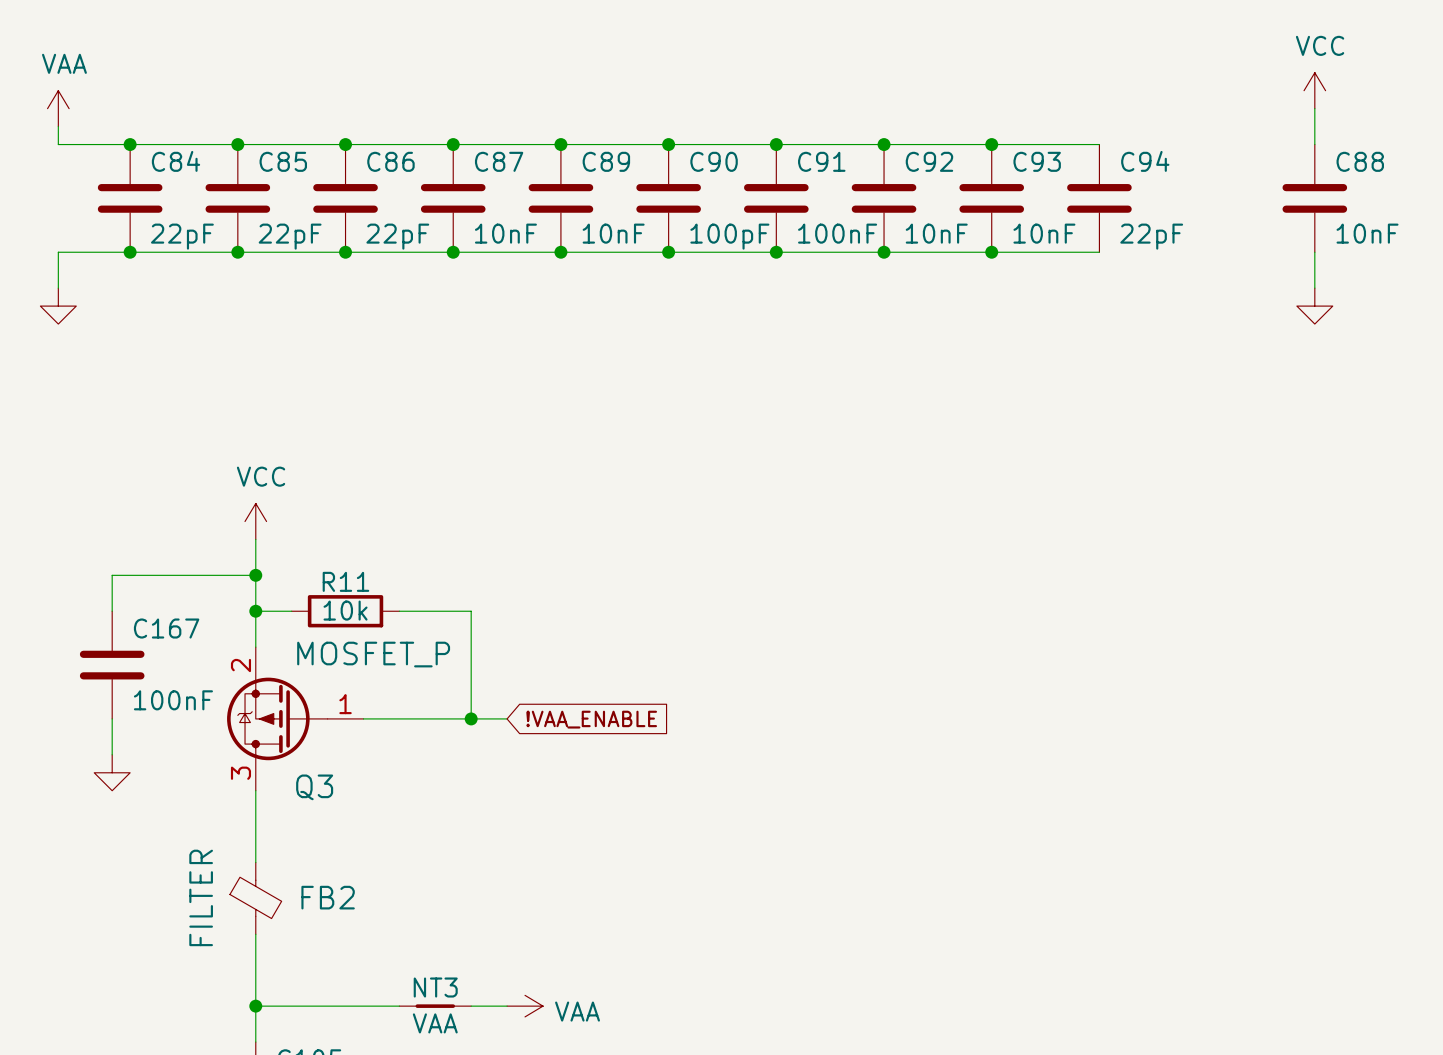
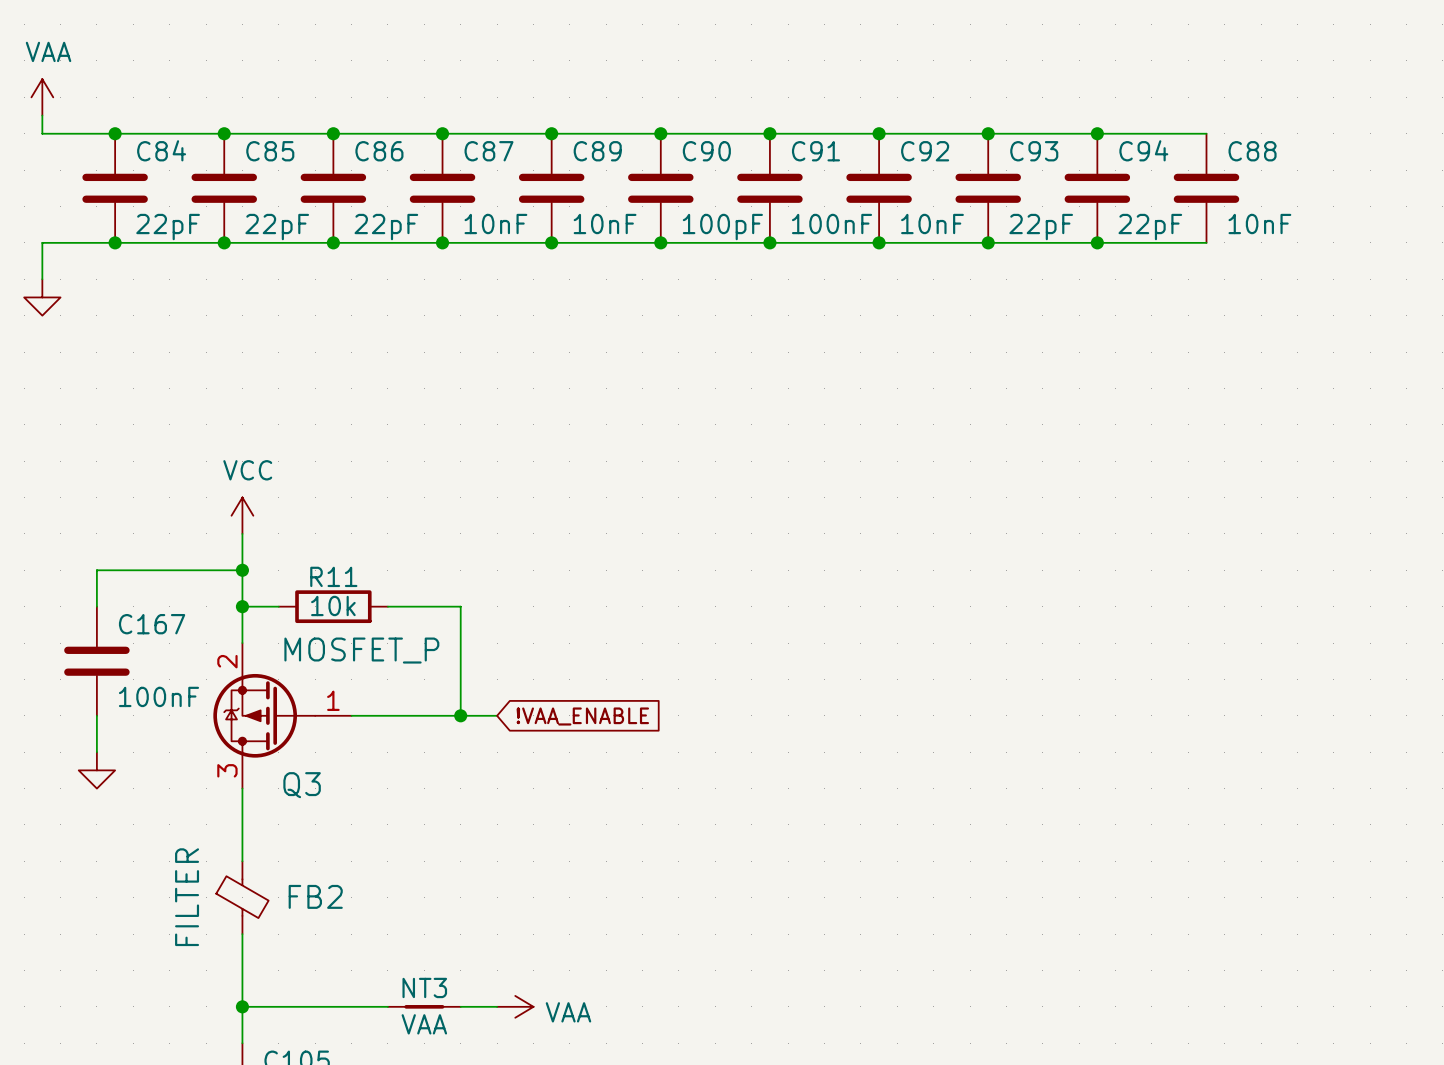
power symbol: VCC (1314, 90) -> none
wire: (1314, 108) (1314, 144) -> none
wire: none -> (1097, 133) (1206, 133)
junction: none -> (1097, 133)
C88 position: (1314, 198) -> (1206, 188)
C93 value: 10nF (1044, 233) -> 22pF (1041, 227)
wire: none -> (1097, 242) (1206, 242)
junction: none -> (1097, 242)
wire: (1314, 252) (1314, 288) -> none
power symbol: (1314, 306) -> none

